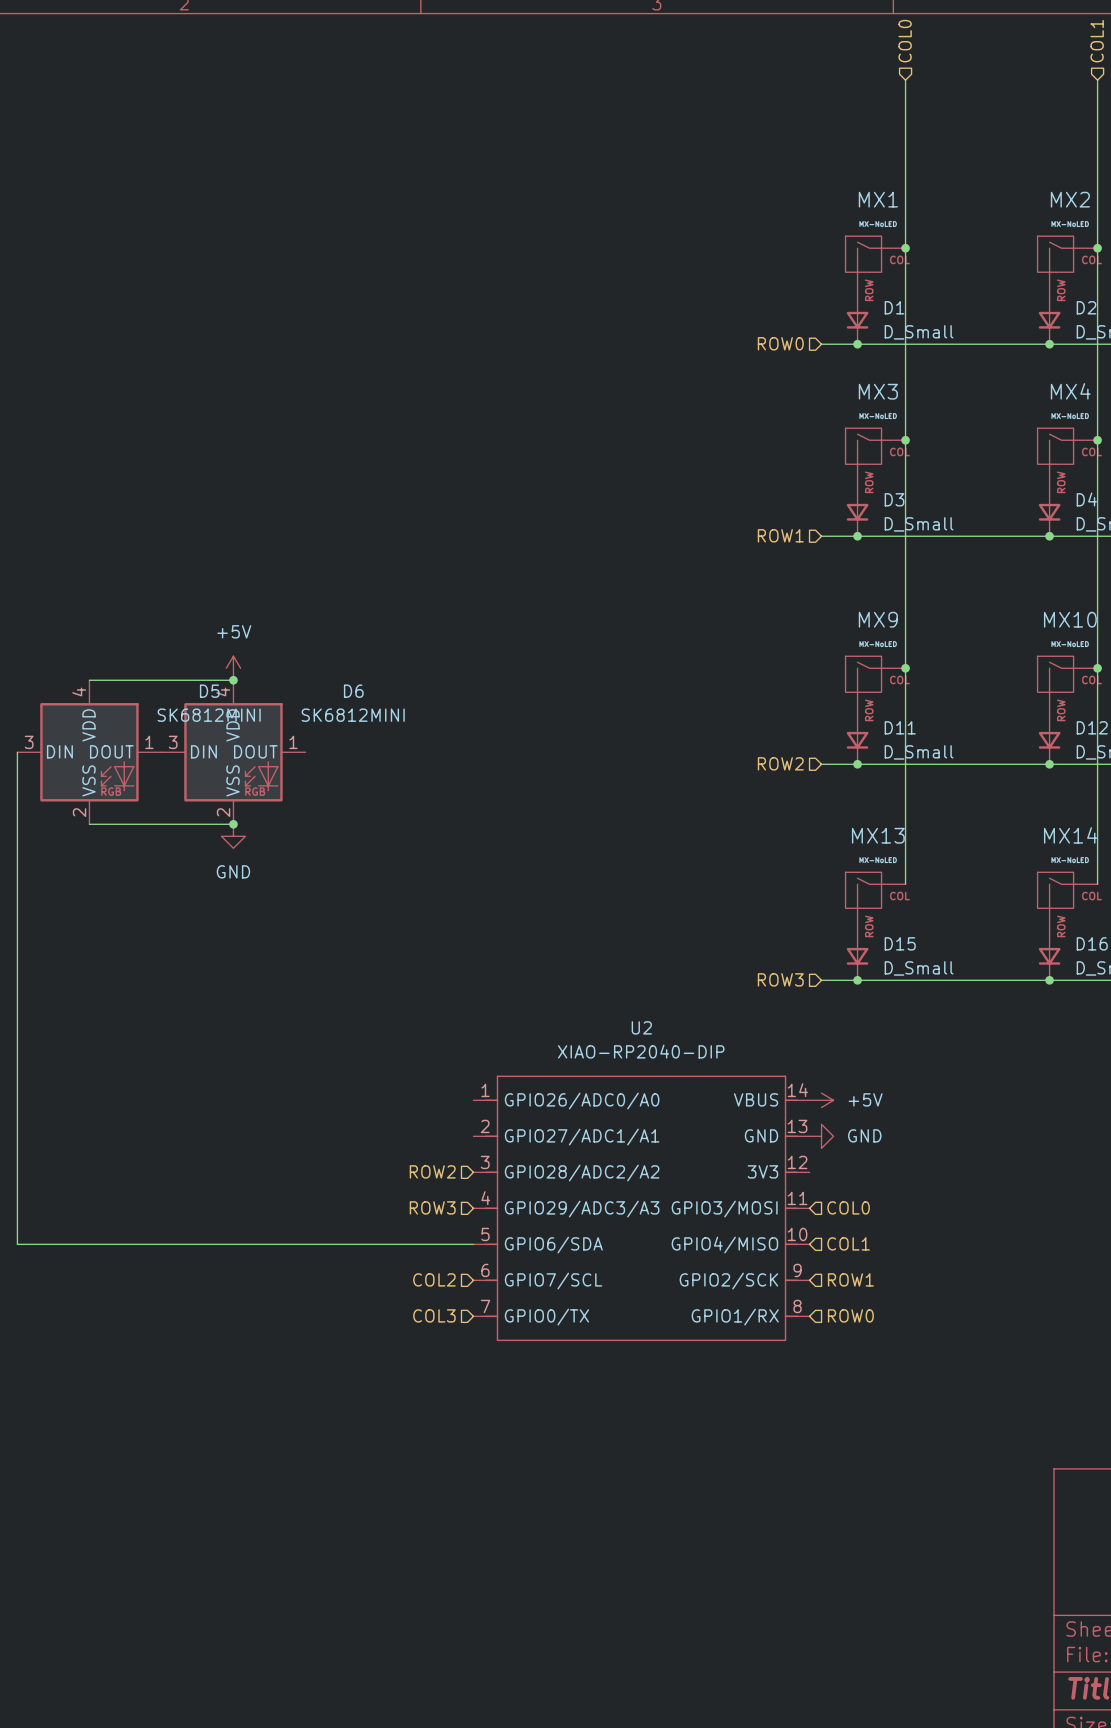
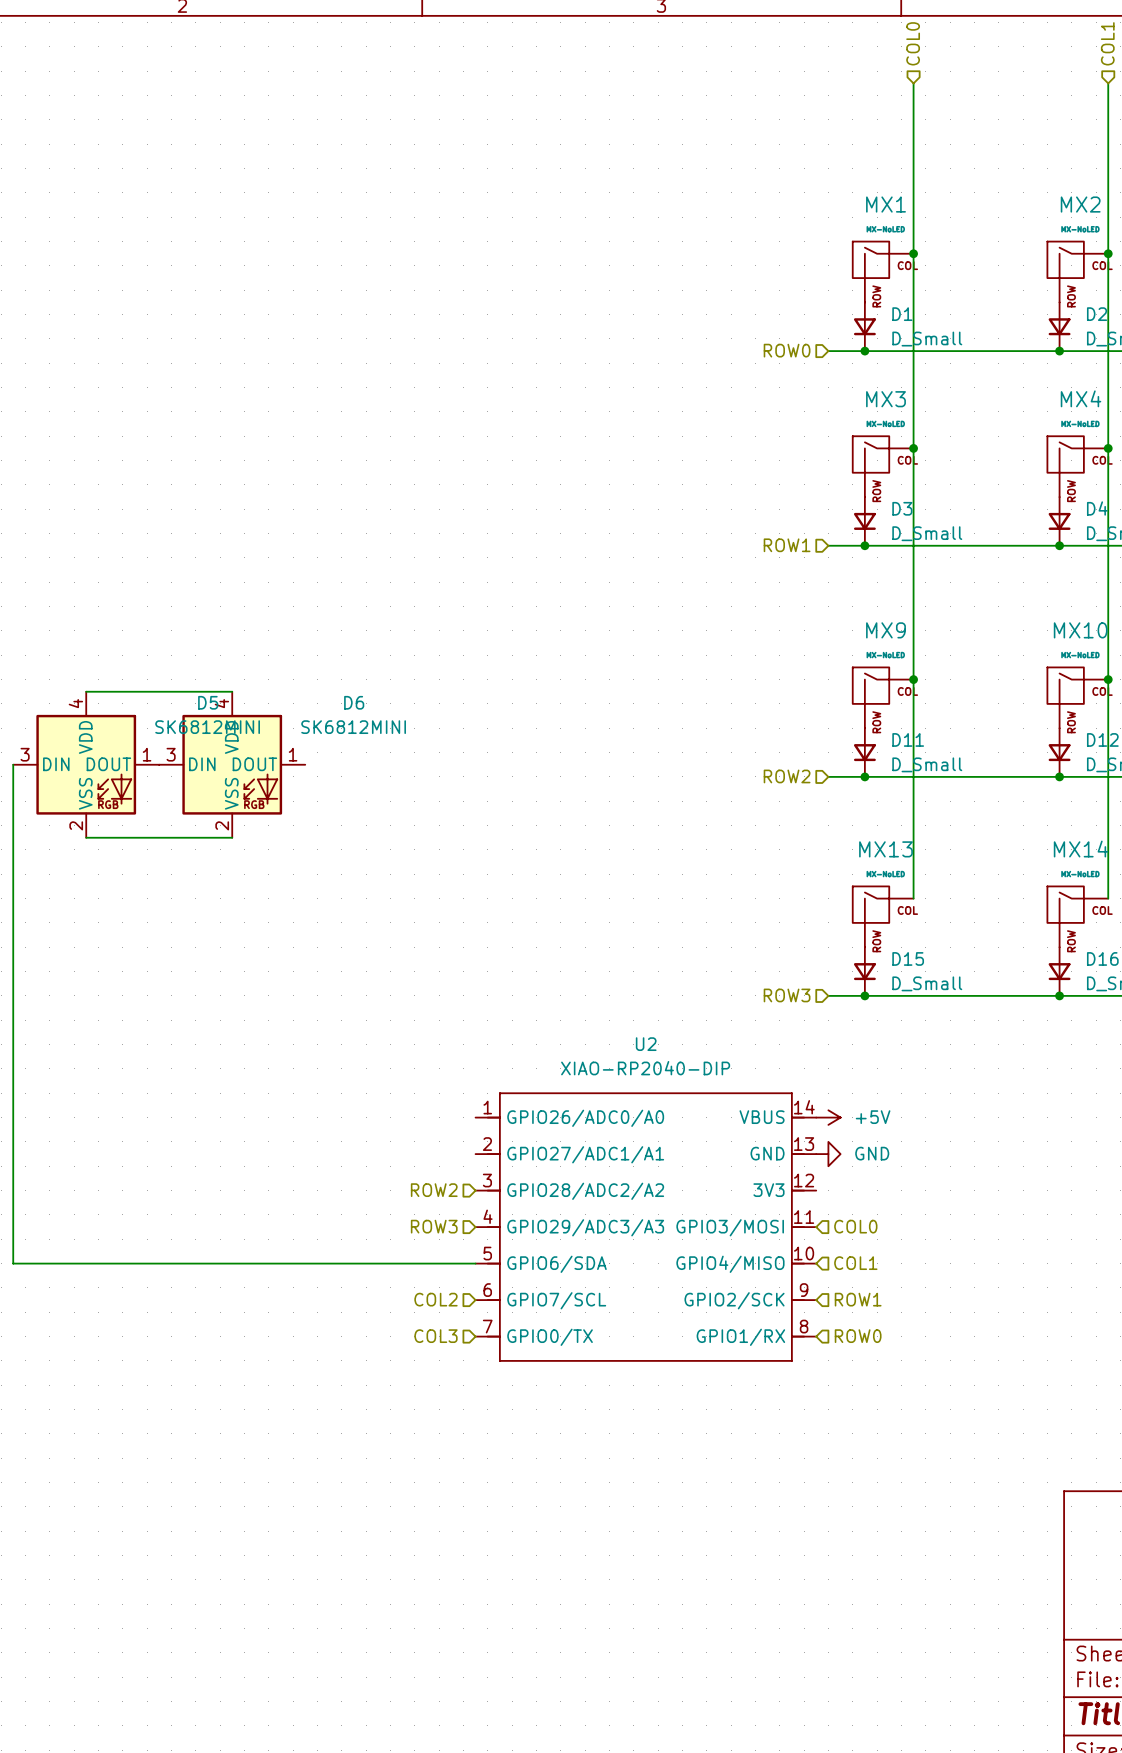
power symbol: +5V (233, 668) -> none
junction: (233, 680) -> none
junction: (233, 824) -> none
power symbol: GND (233, 836) -> none

